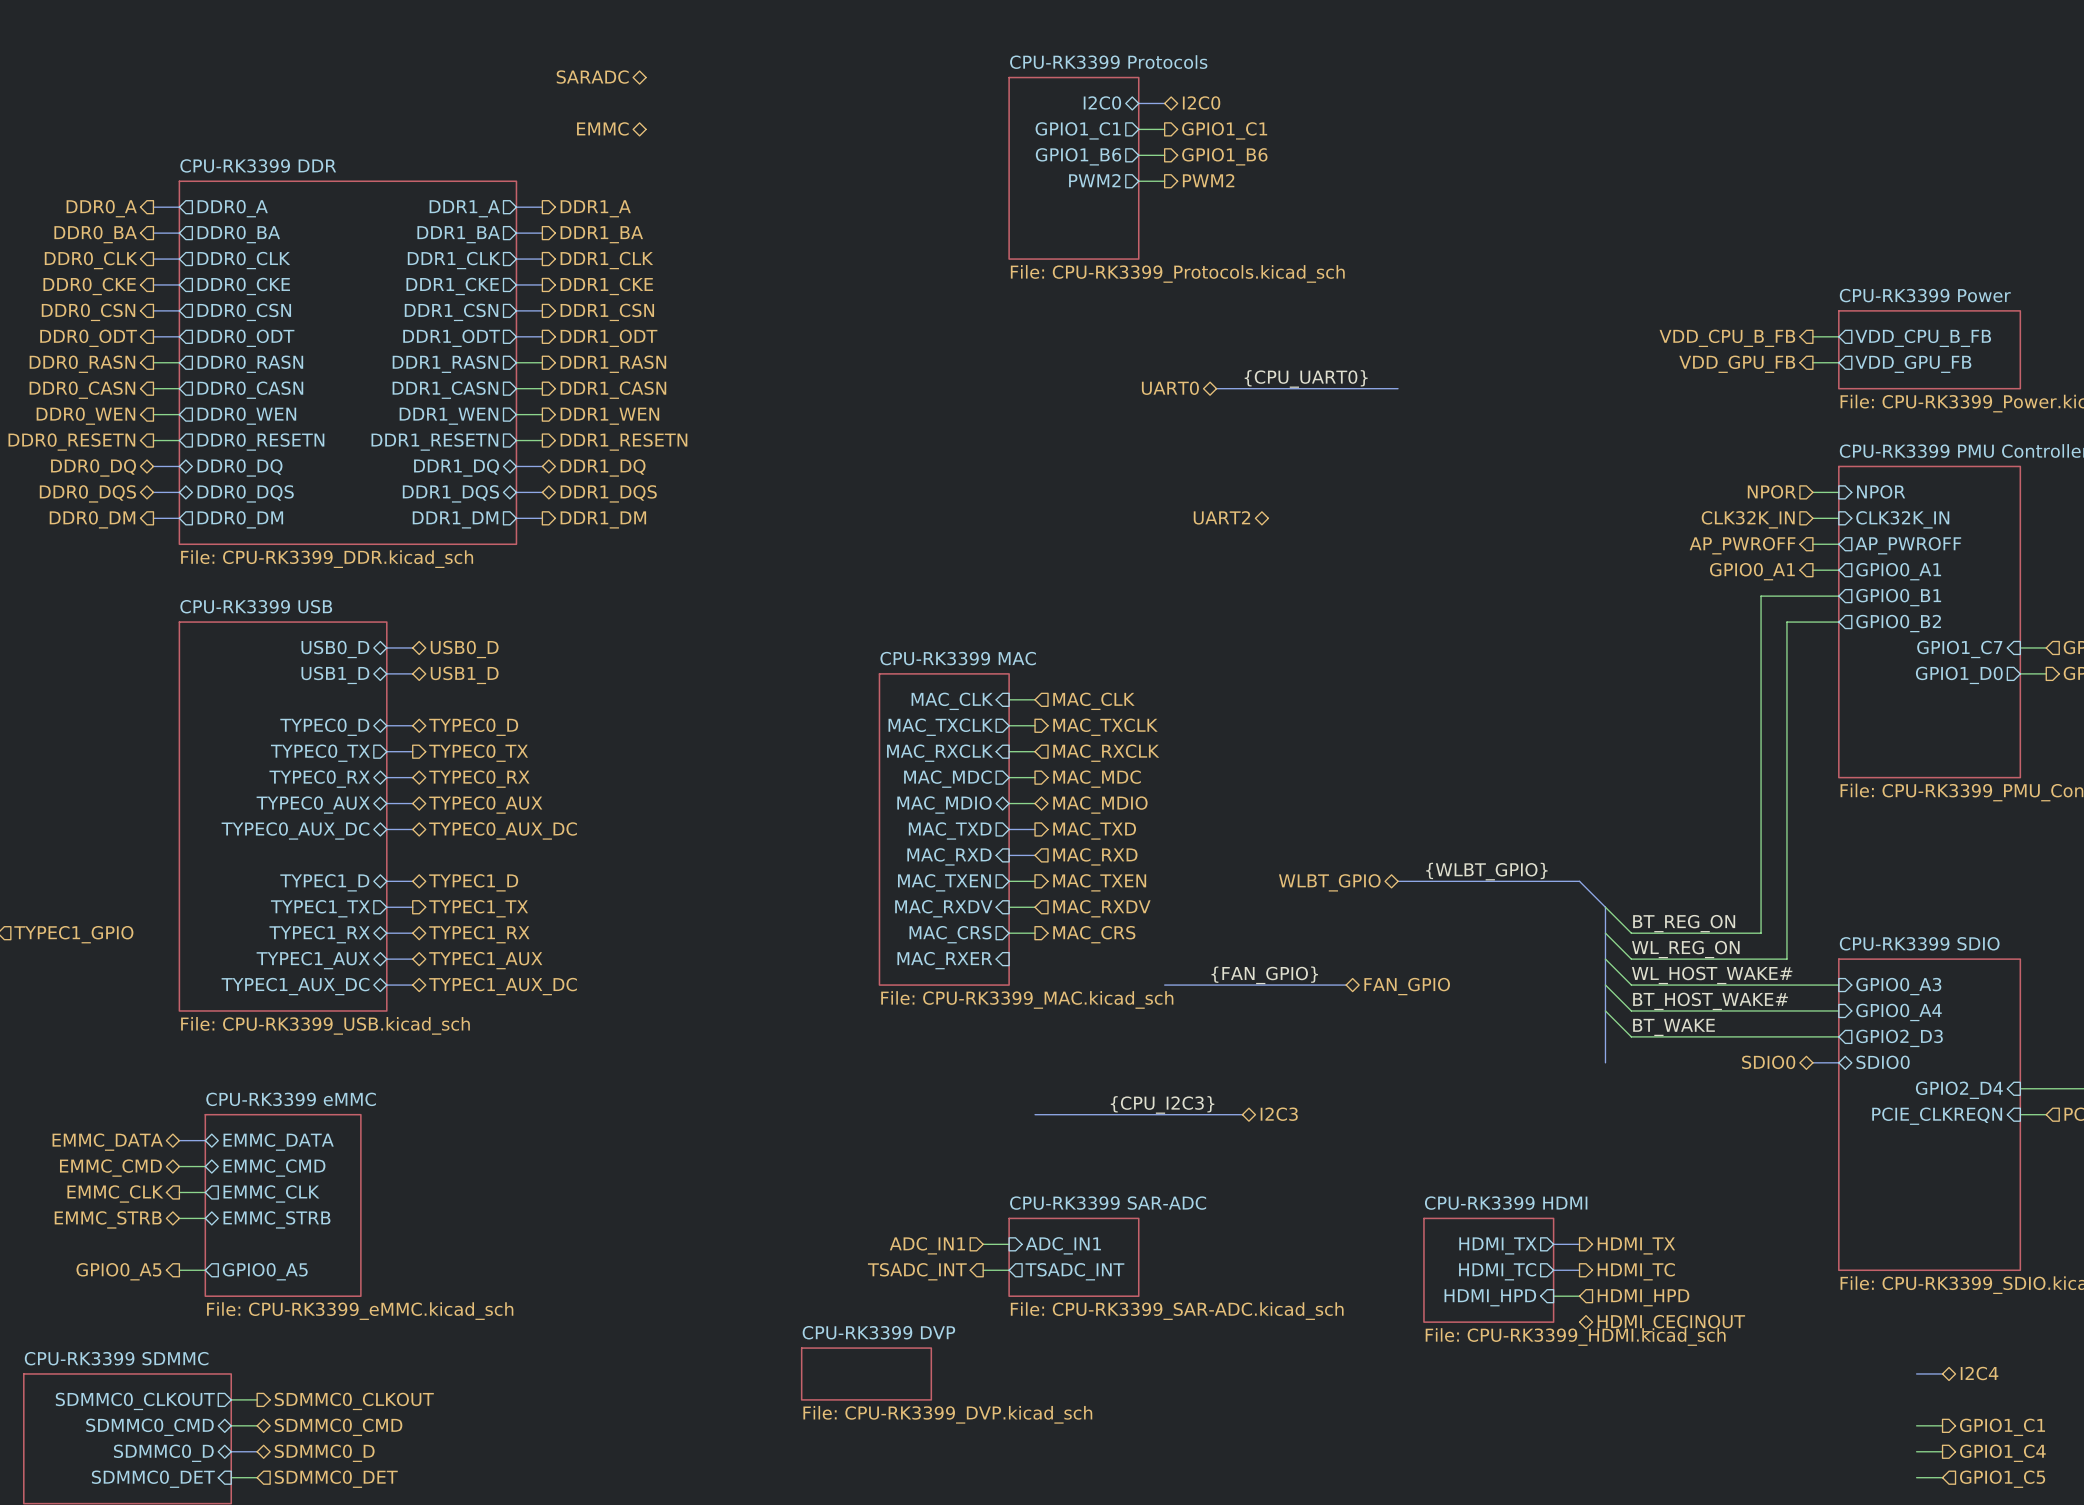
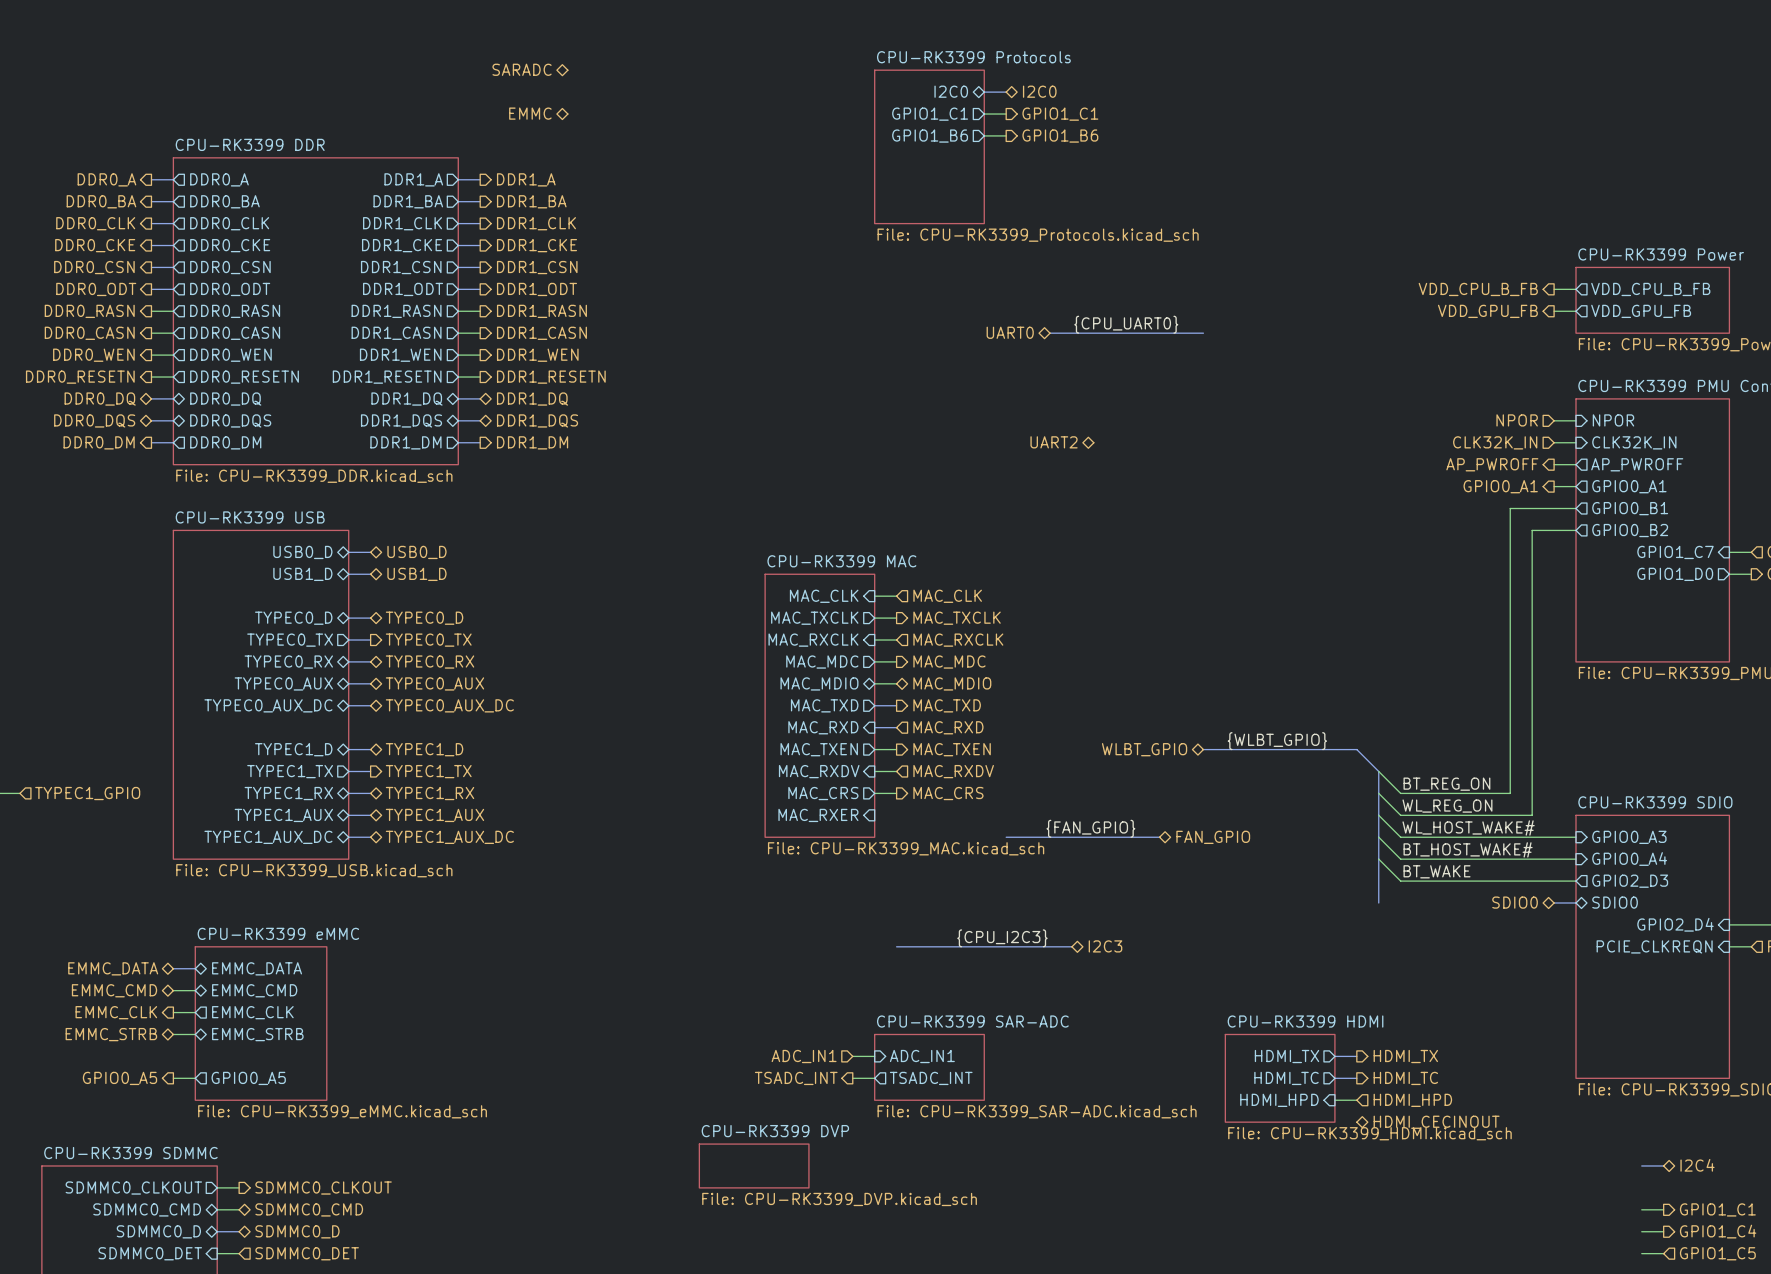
sheet pin: PWM2 (1094, 180) -> none
hierarchical label: PWM2 (1208, 180) -> none
wire: (1138, 181) (1164, 181) -> none

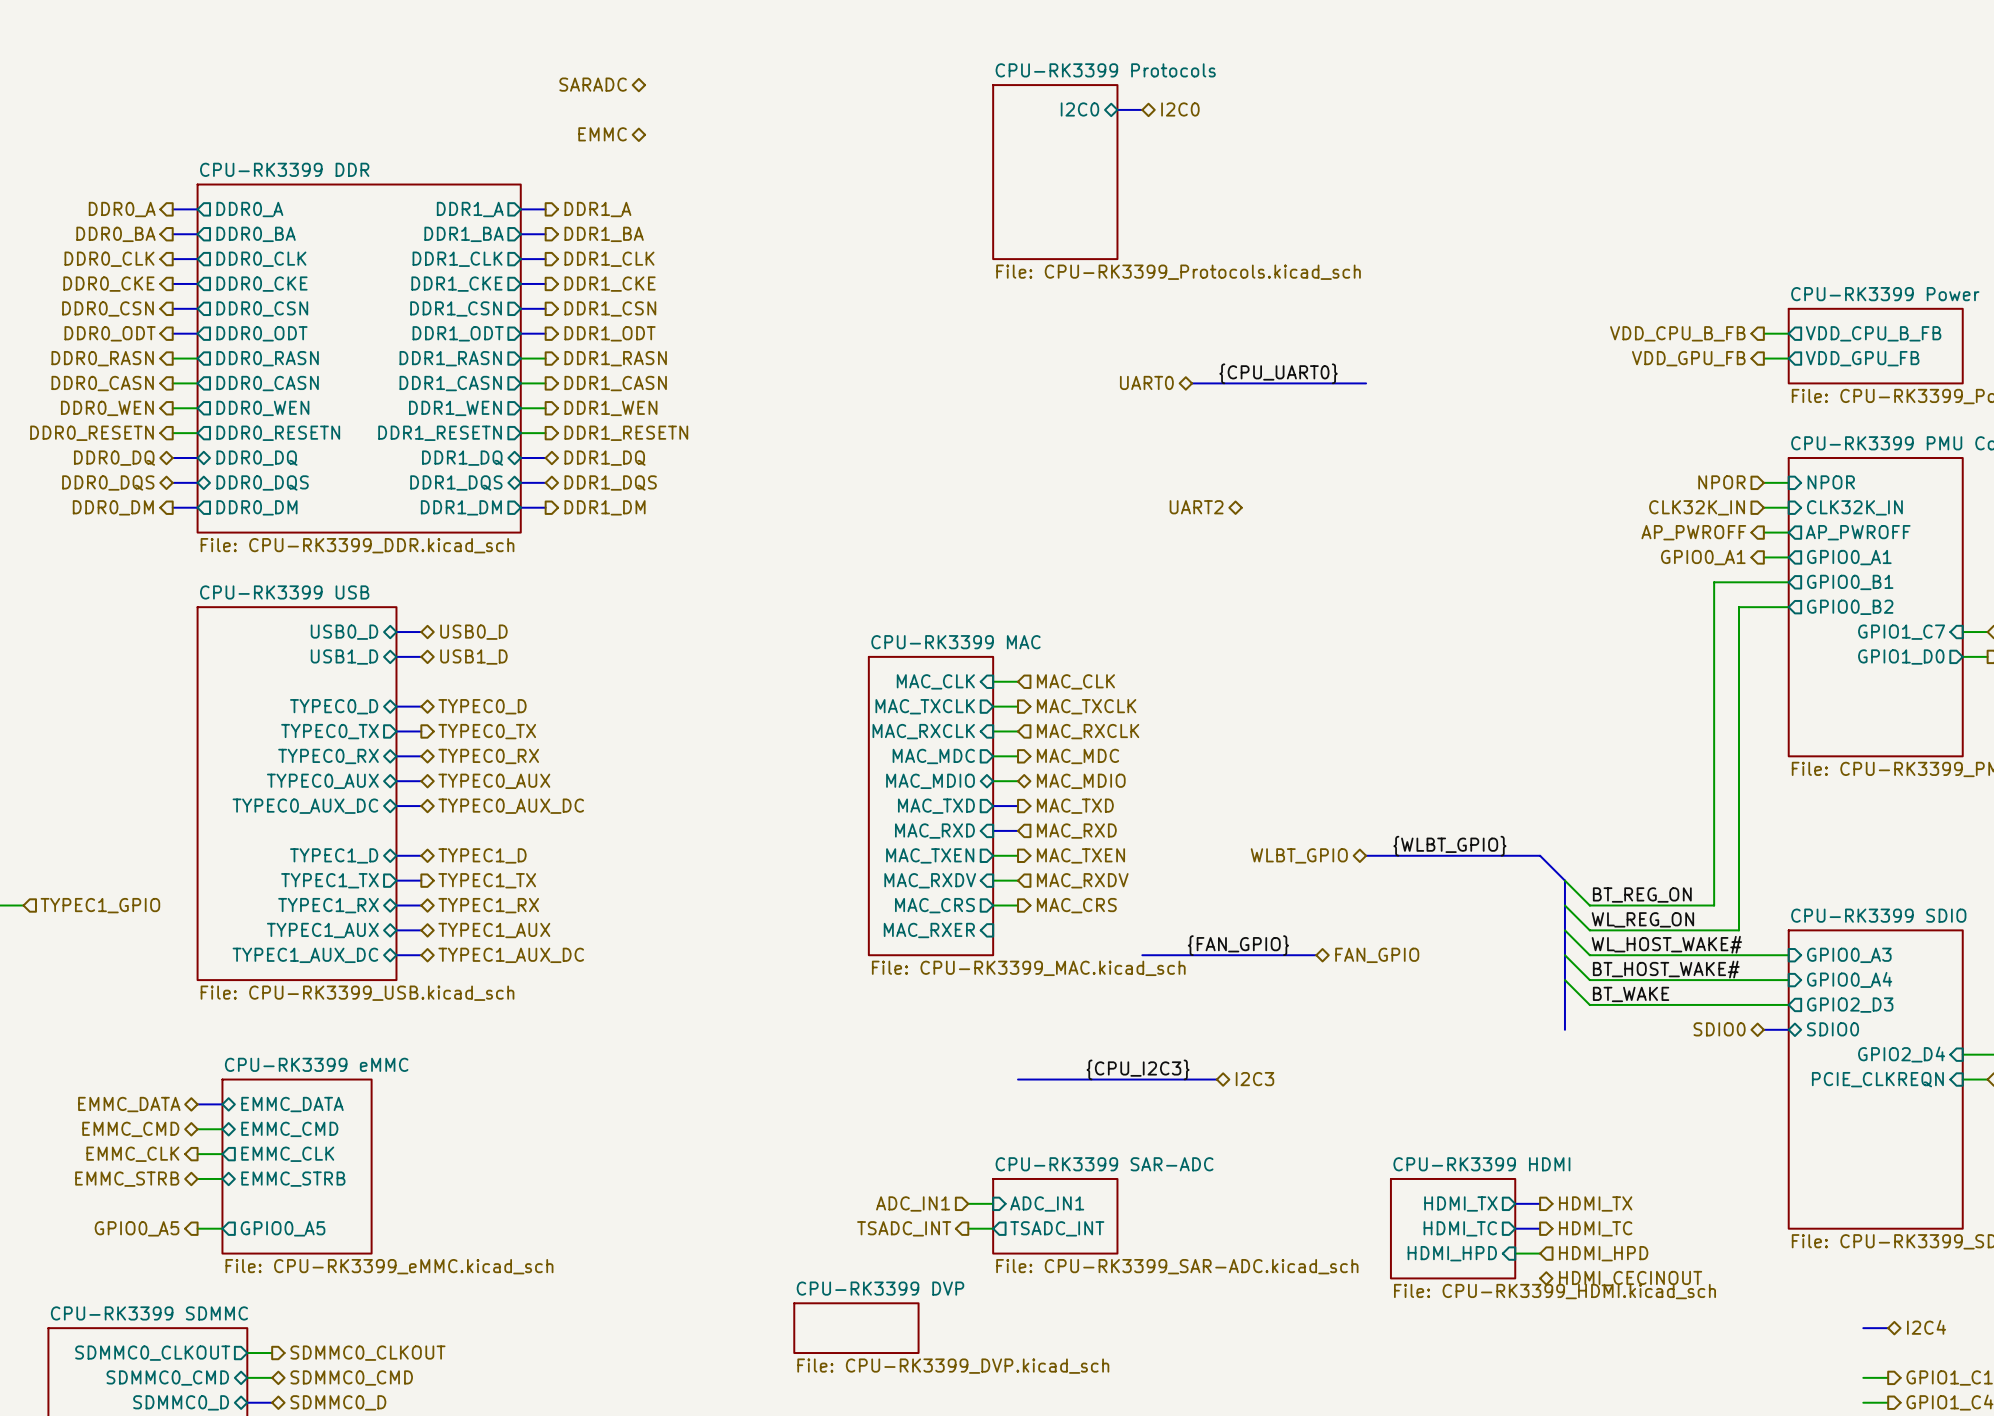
sheet pin: GPIO1_C1 (930, 114) -> none
wire: (984, 114) (1006, 114) -> none
hierarchical label: GPIO1_C1 (1060, 114) -> none
wire: (984, 135) (1006, 135) -> none
sheet pin: GPIO1_B6 (930, 136) -> none
hierarchical label: GPIO1_B6 (1060, 136) -> none

